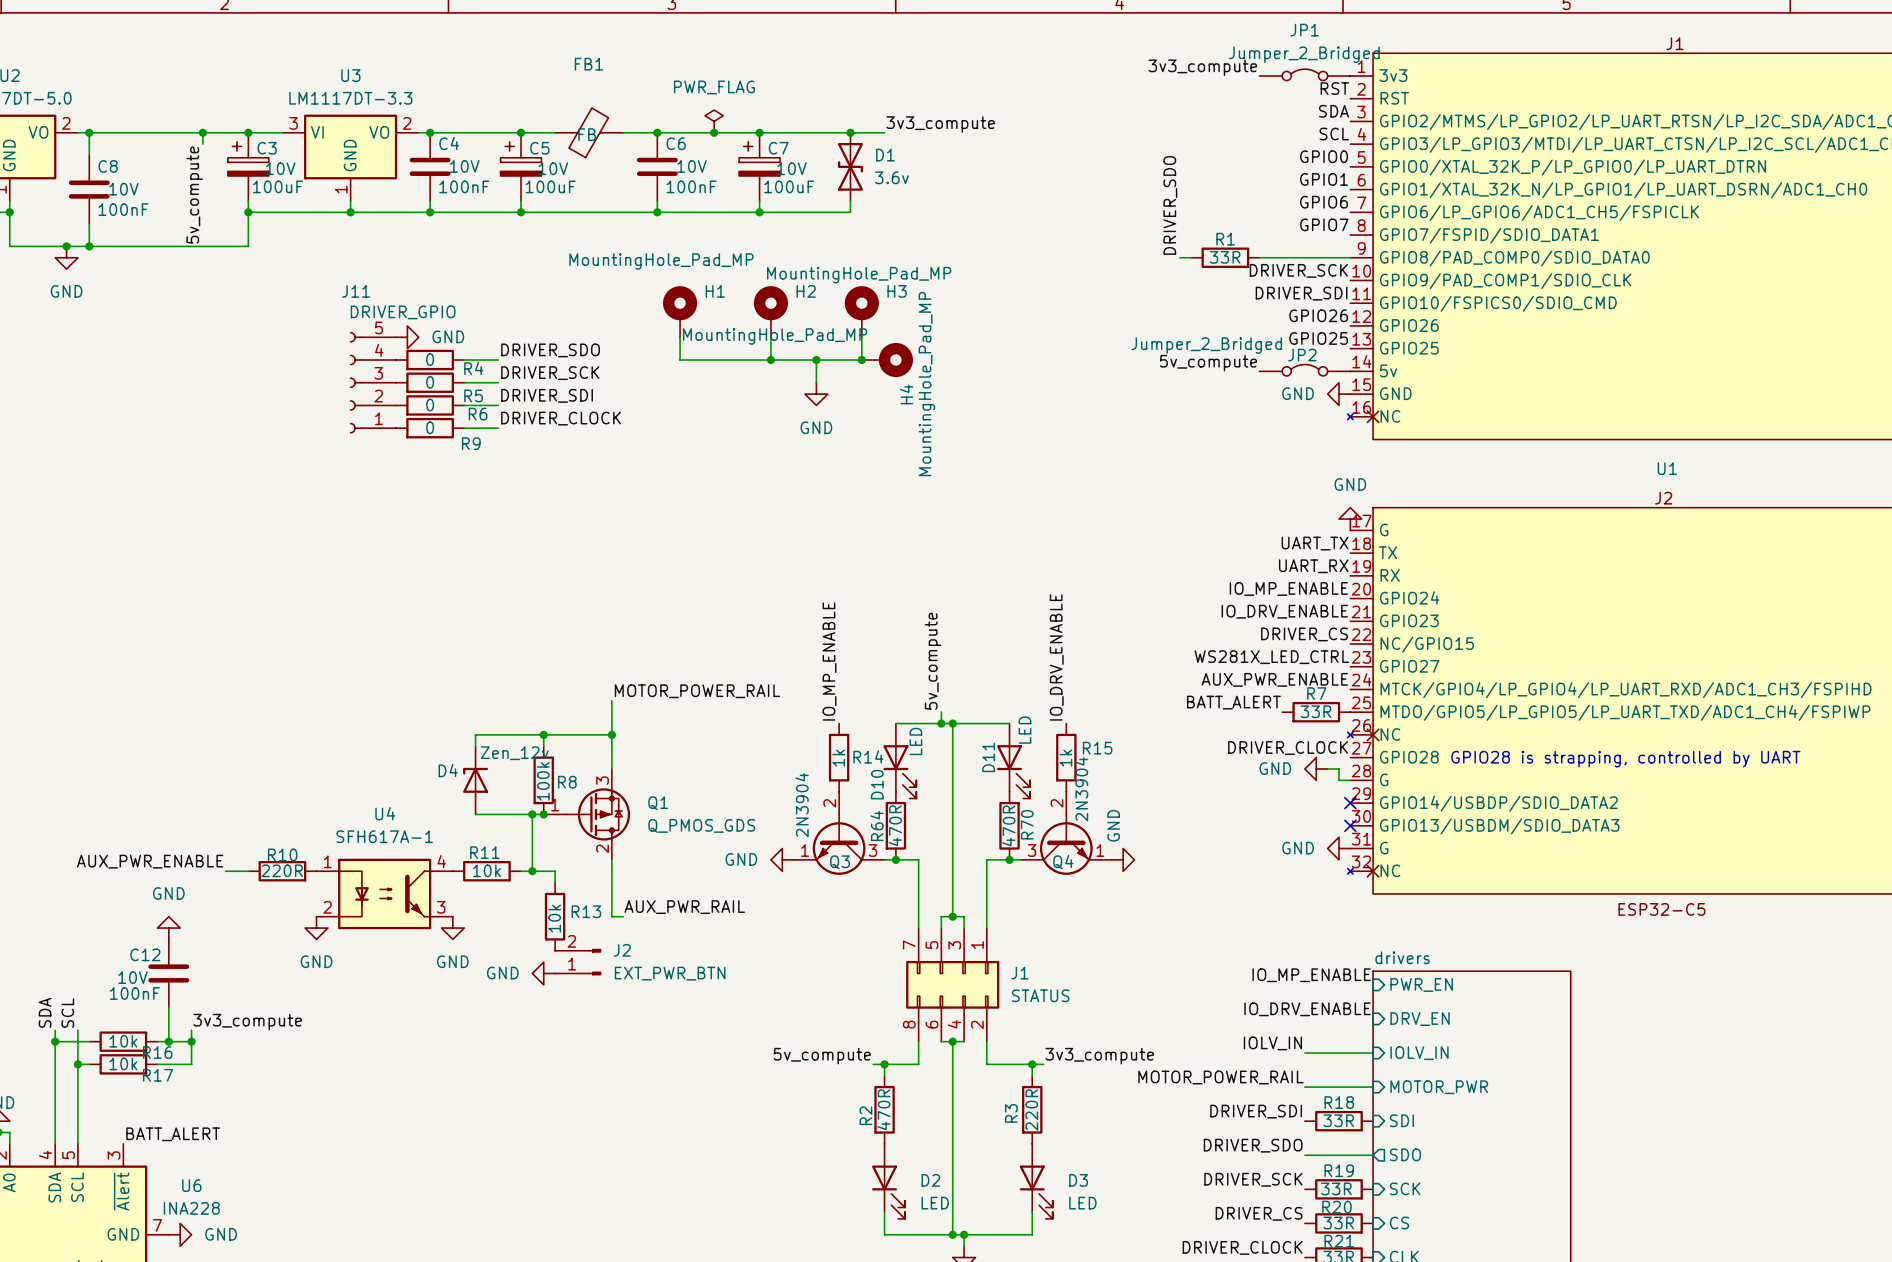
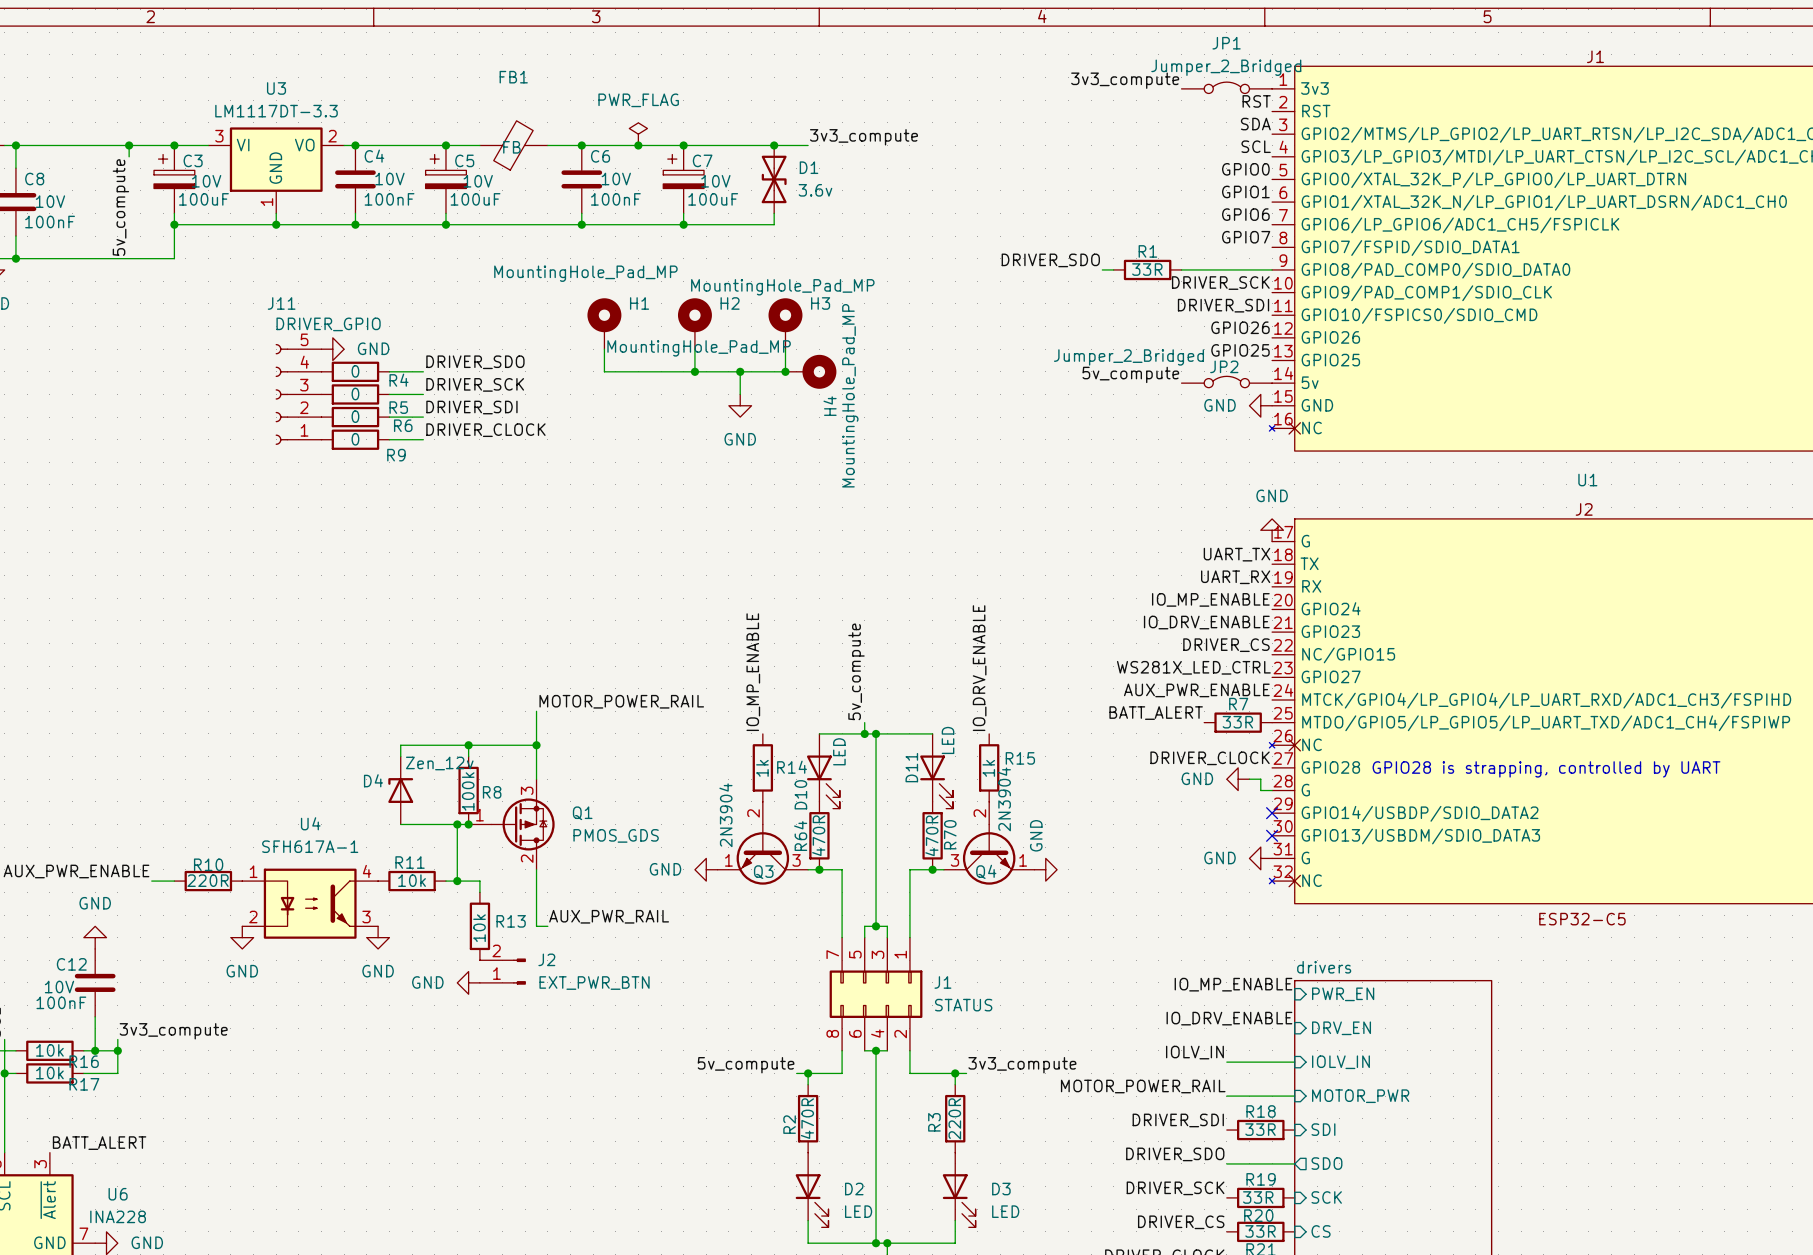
label rotation: 0° (1170, 205) -> 90° clockwise (1050, 260)
Q1 value: Q_PMOS_GDS (701, 825) -> PMOS_GDS (616, 835)

